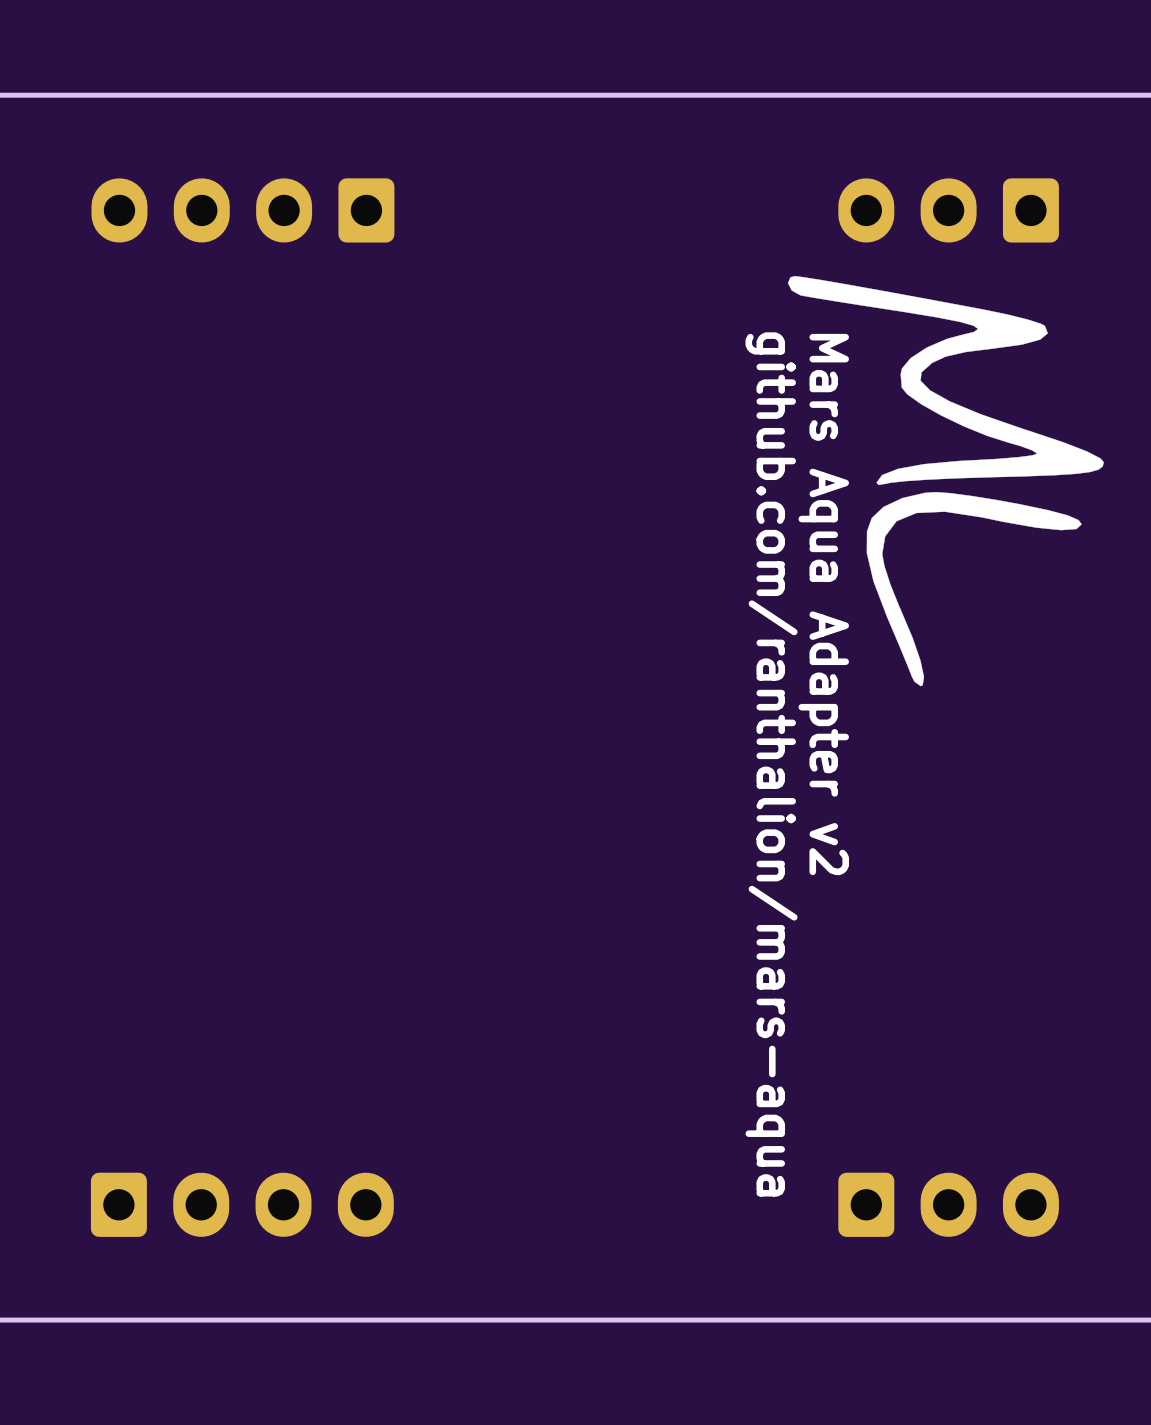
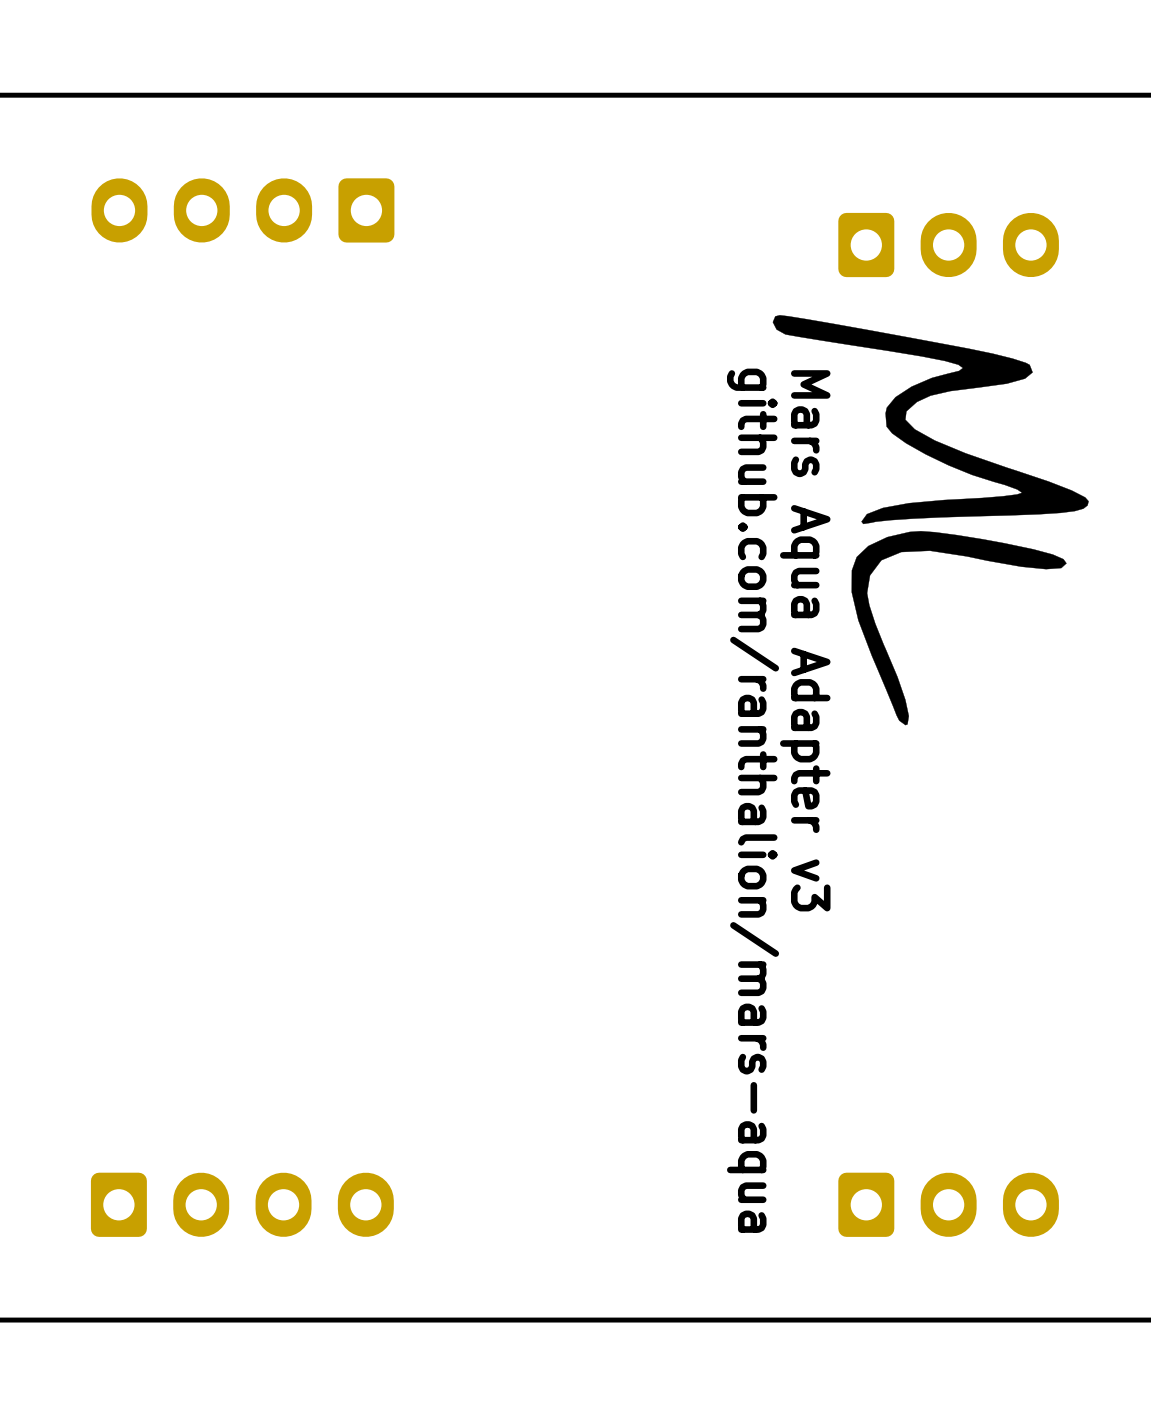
part rotation: 0° (948, 210) -> 180° (948, 245)
drawing position: (945, 481) -> (930, 520)
text: Mars Aqua Adapter v2 (823, 604) -> Mars Aqua Adapter v3 (805, 640)
text position: github.com/ranthalion/mars-aqua (771, 764) -> github.com/ranthalion/mars-aqua (753, 800)

